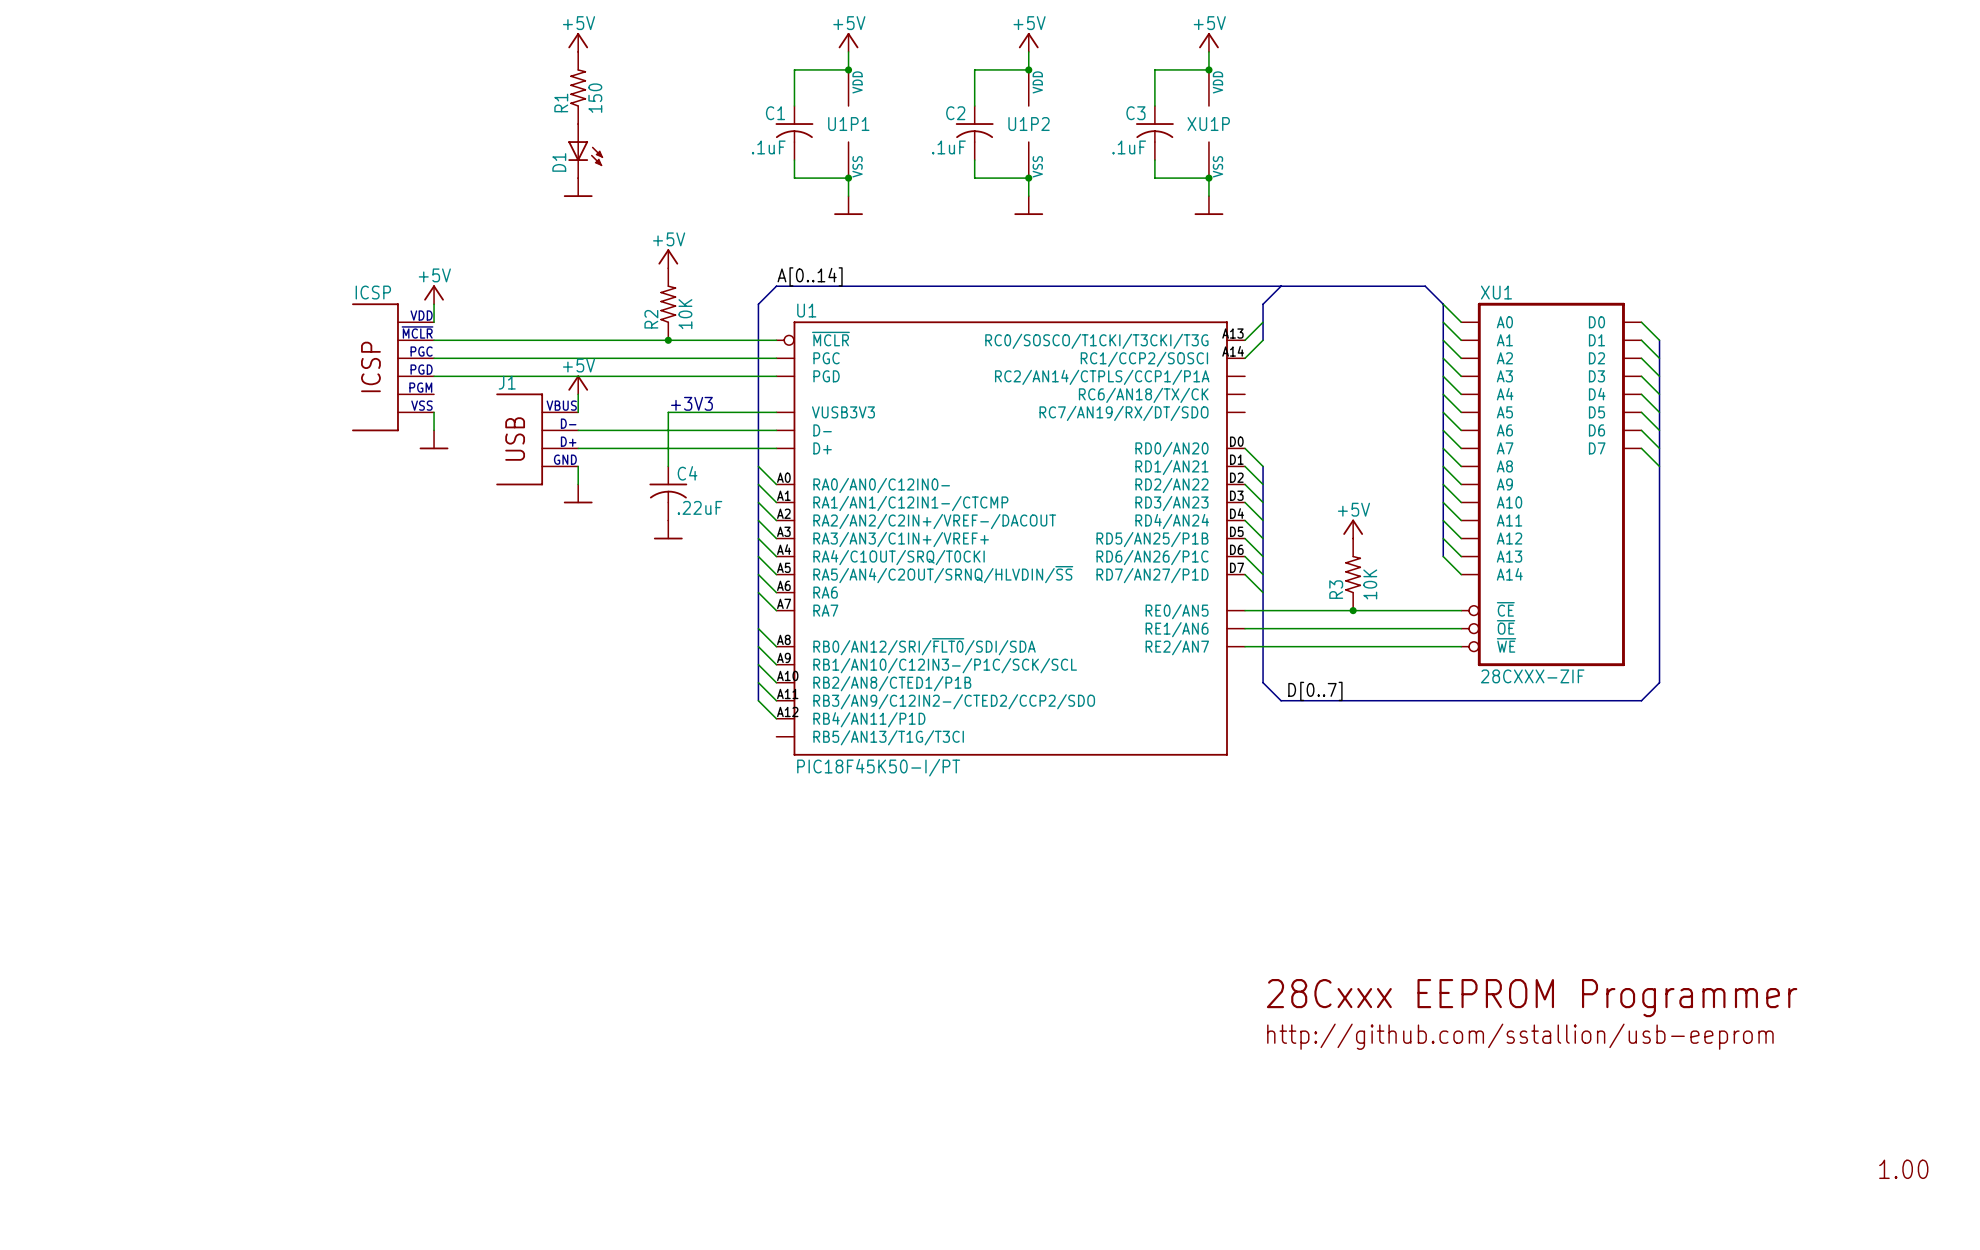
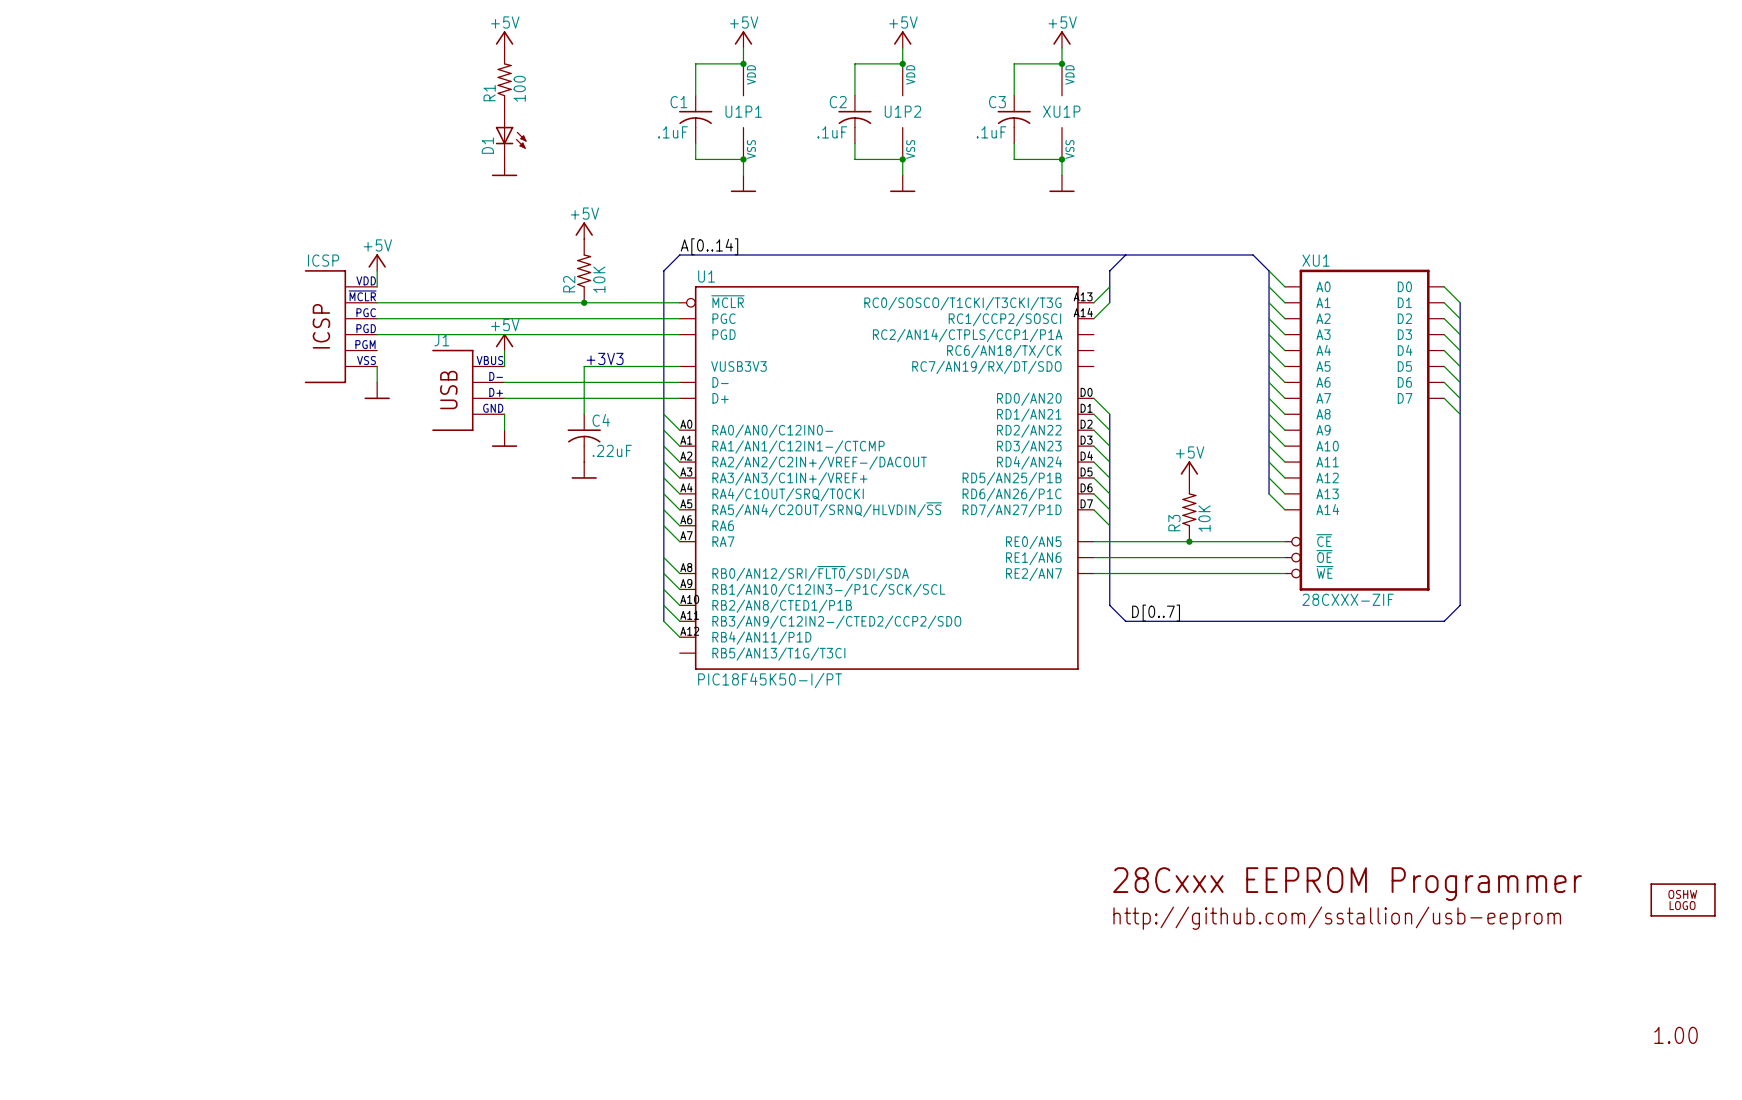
R1 value: 150 (595, 98) -> 100 (519, 88)
part: none -> (1683, 900)

